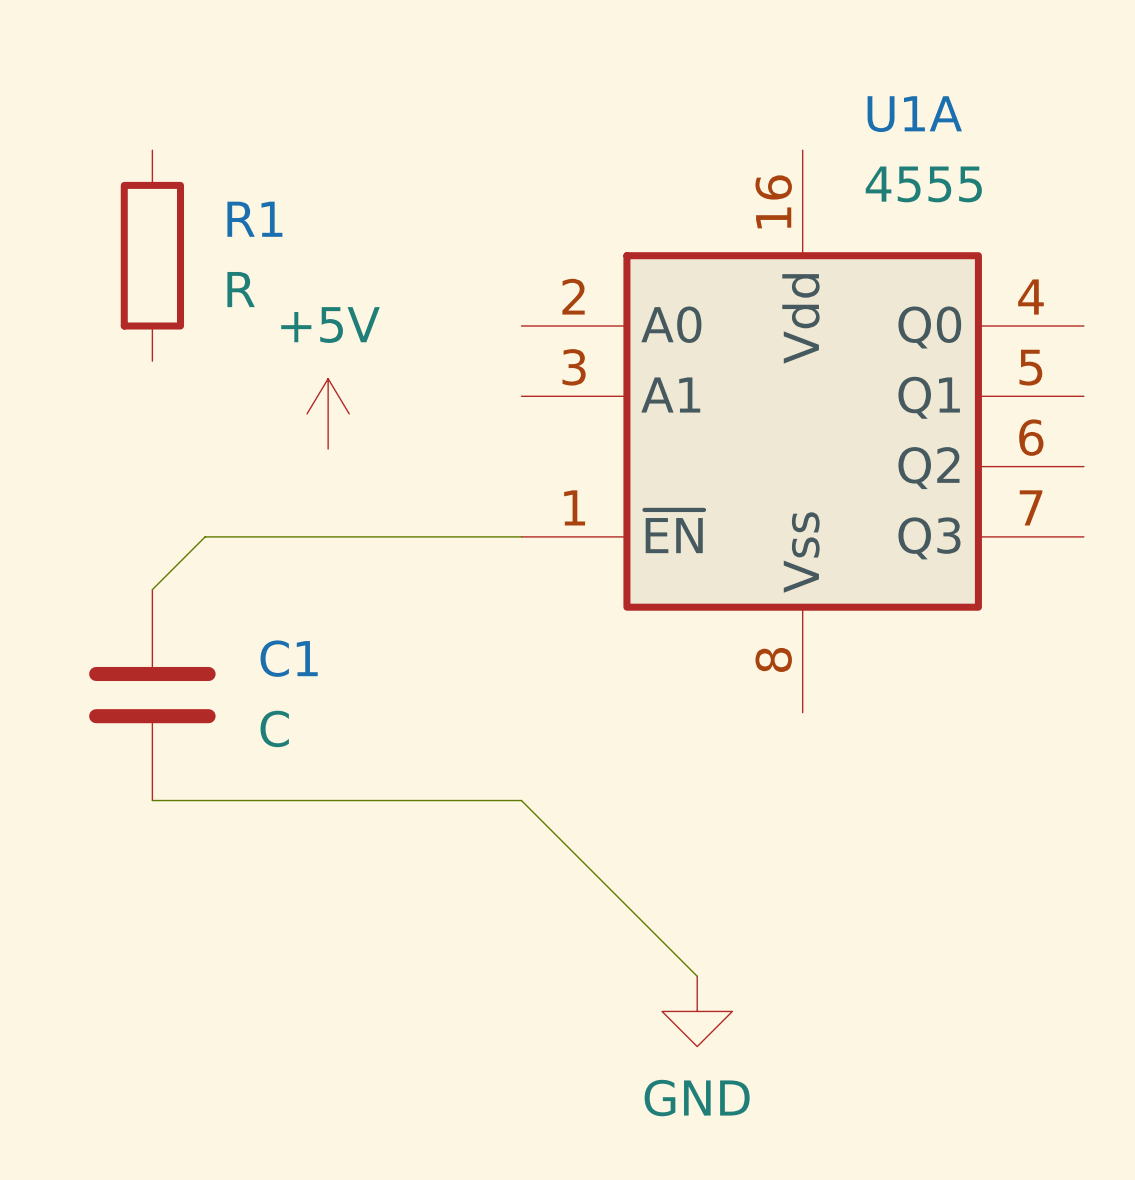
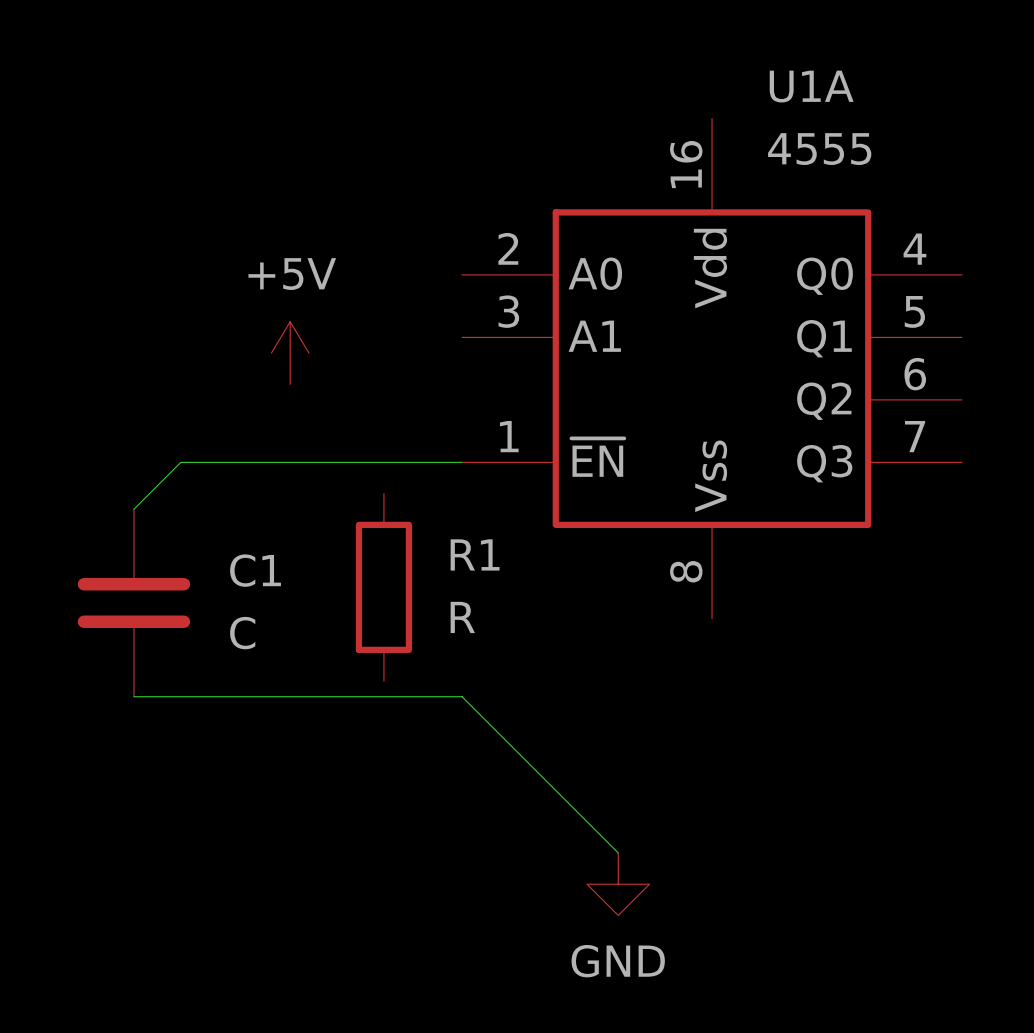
R1 position: (152, 255) -> (383, 587)

